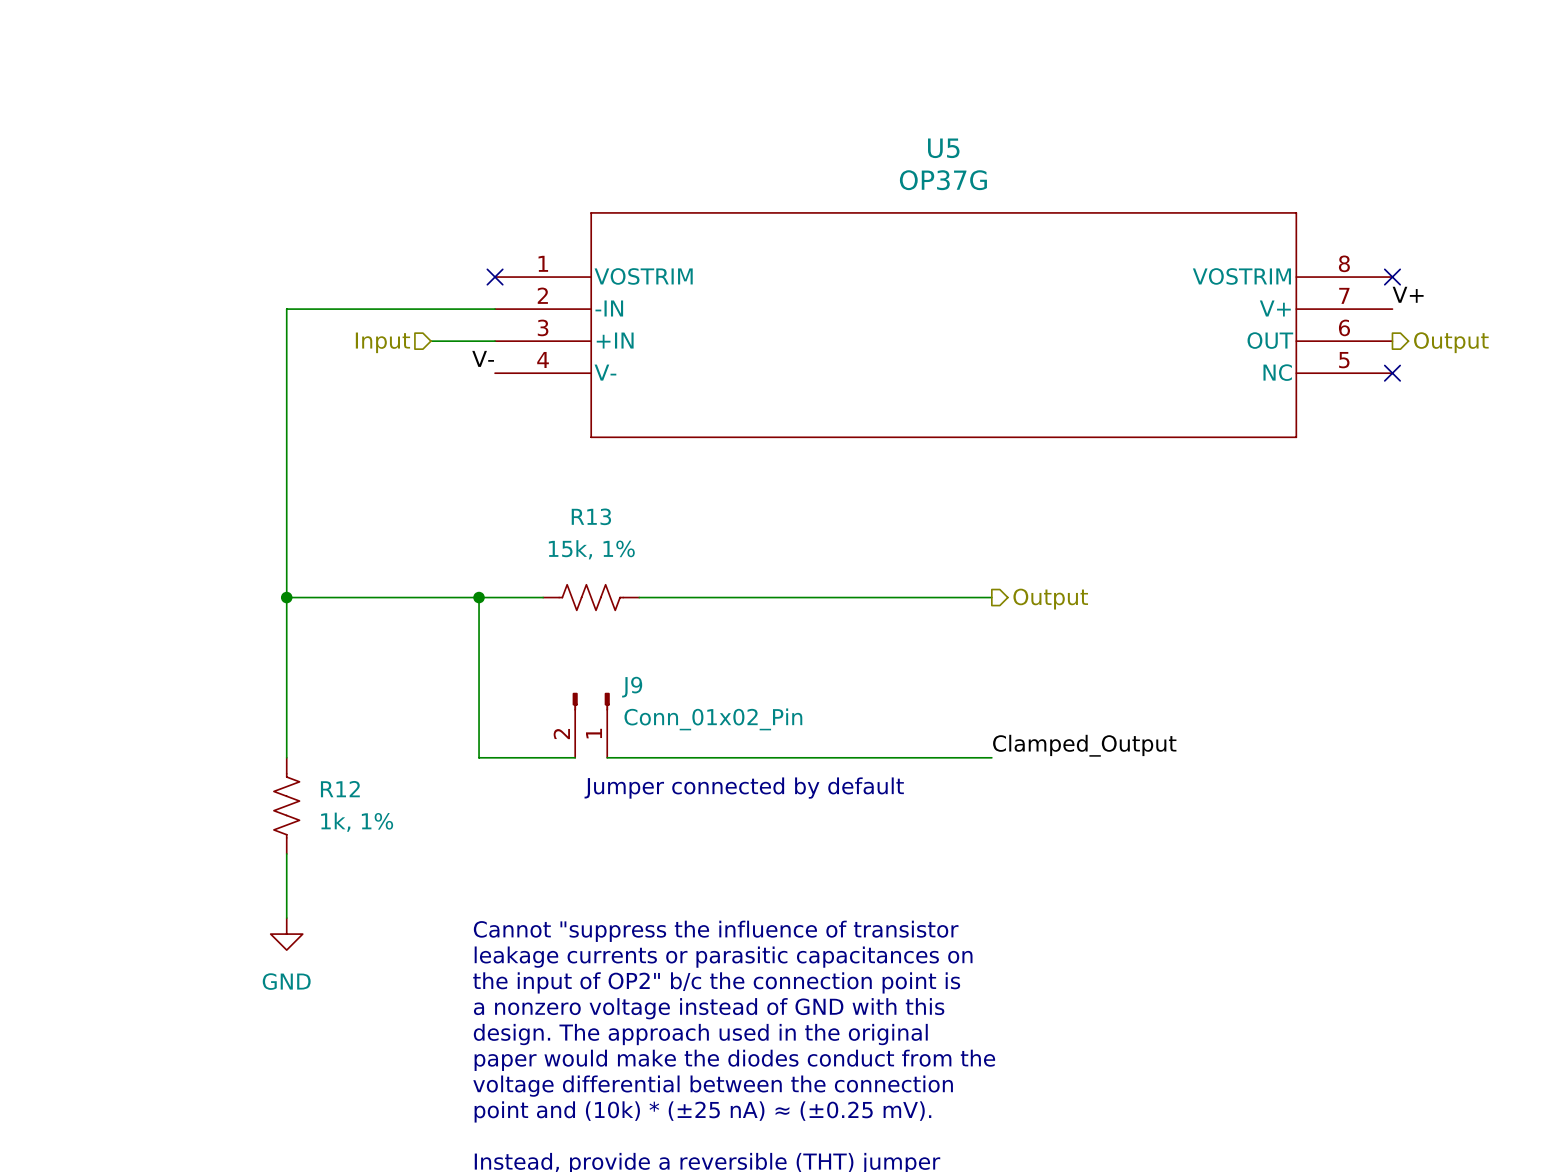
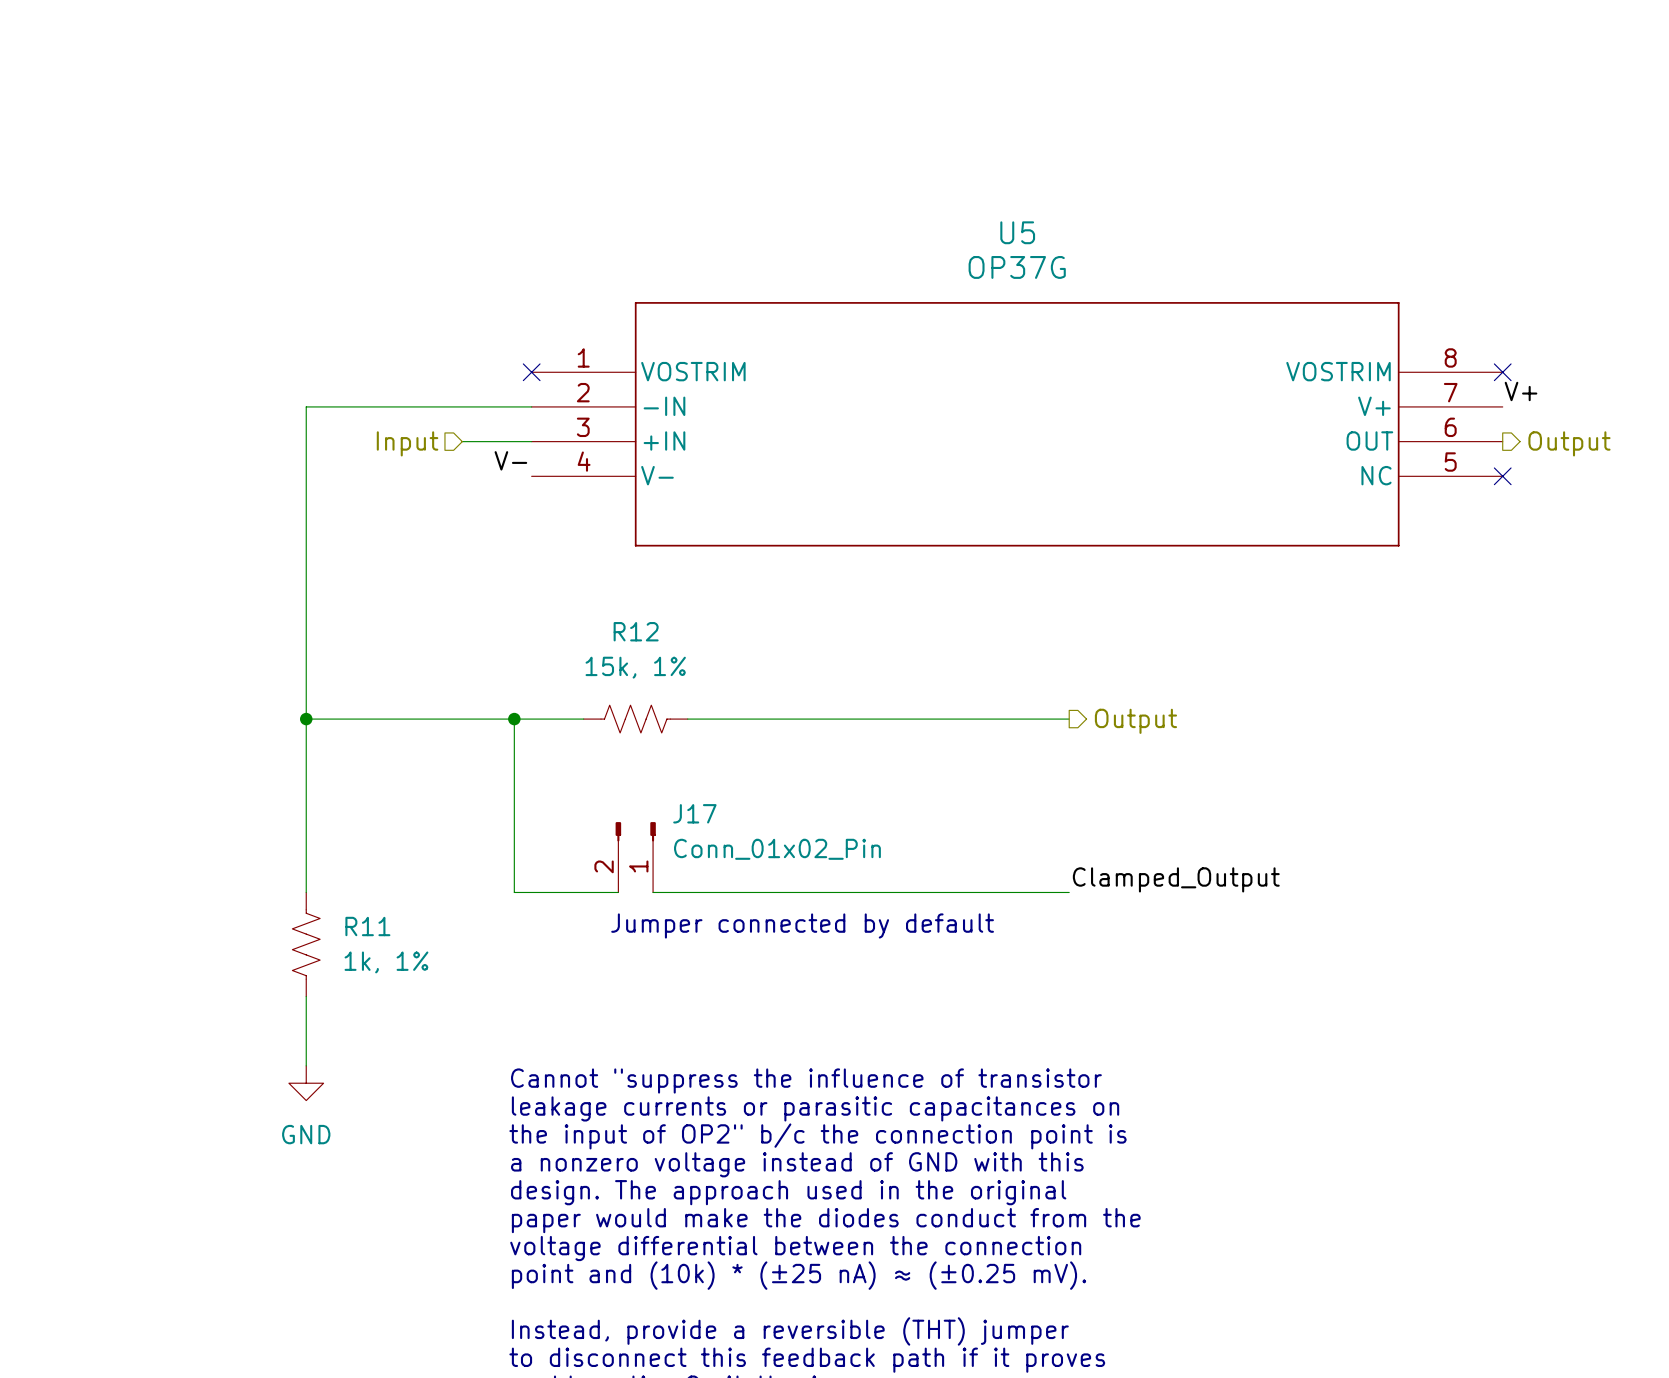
R13 name: R13 (591, 516) -> R12 (636, 631)
J9 name: J9 (632, 687) -> J17 (694, 813)
R12 name: R12 (340, 789) -> R11 (367, 926)

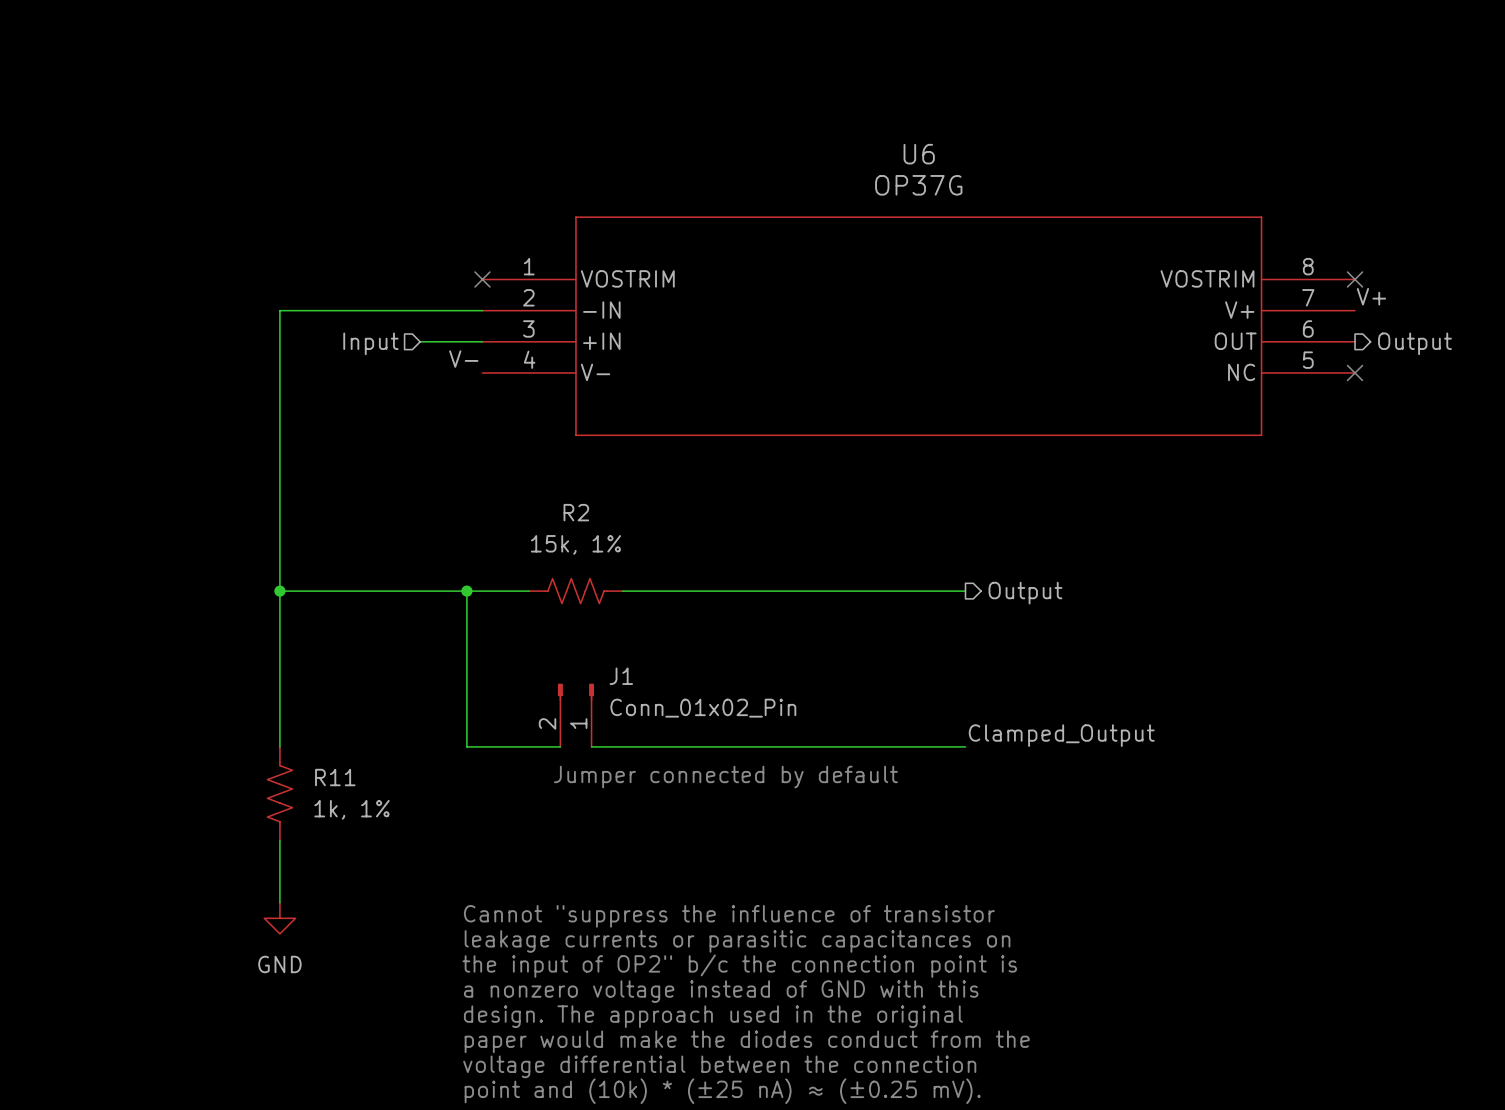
U5 name: U5 (1017, 232) -> U6 (919, 154)
R12 name: R12 (636, 631) -> R2 (576, 512)
J17 name: J17 (694, 813) -> J1 (621, 676)

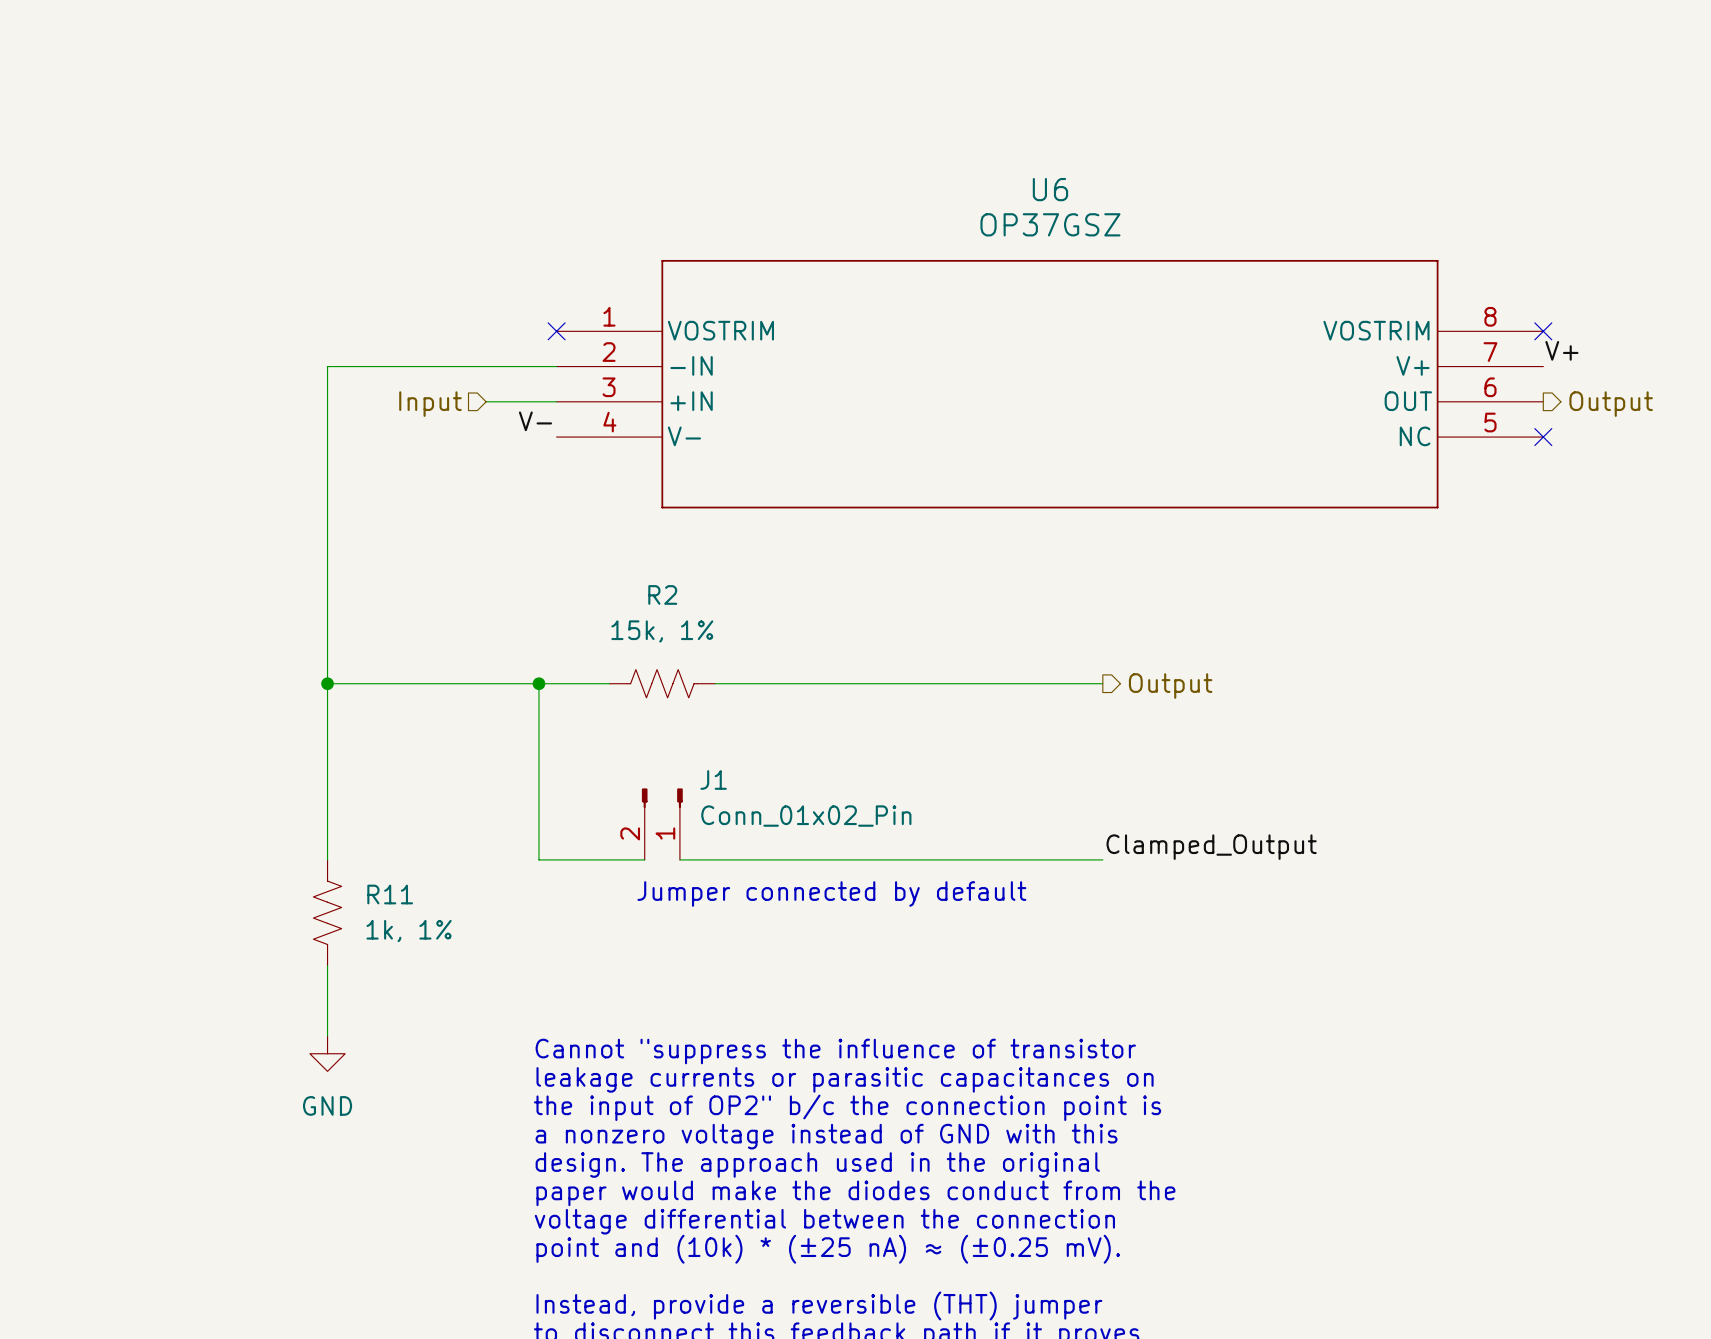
U6 value: OP37G (918, 185) -> OP37GSZ (1050, 224)

